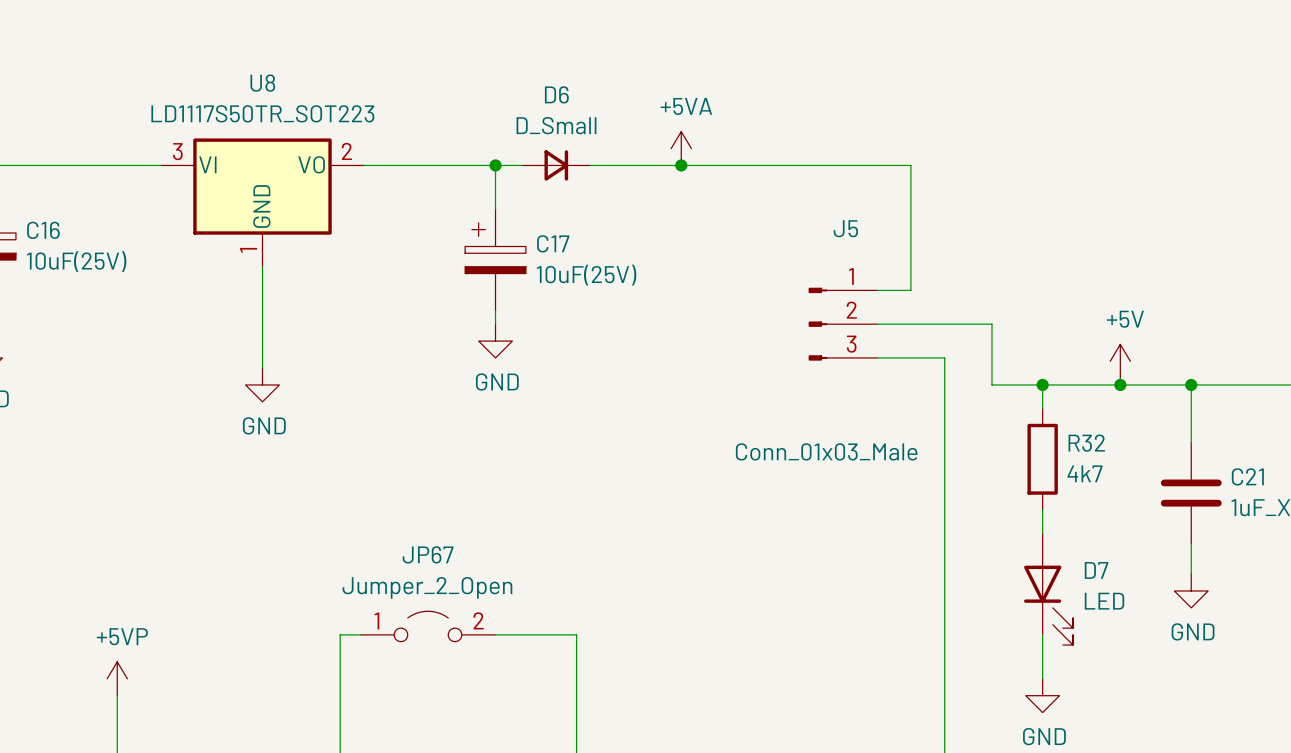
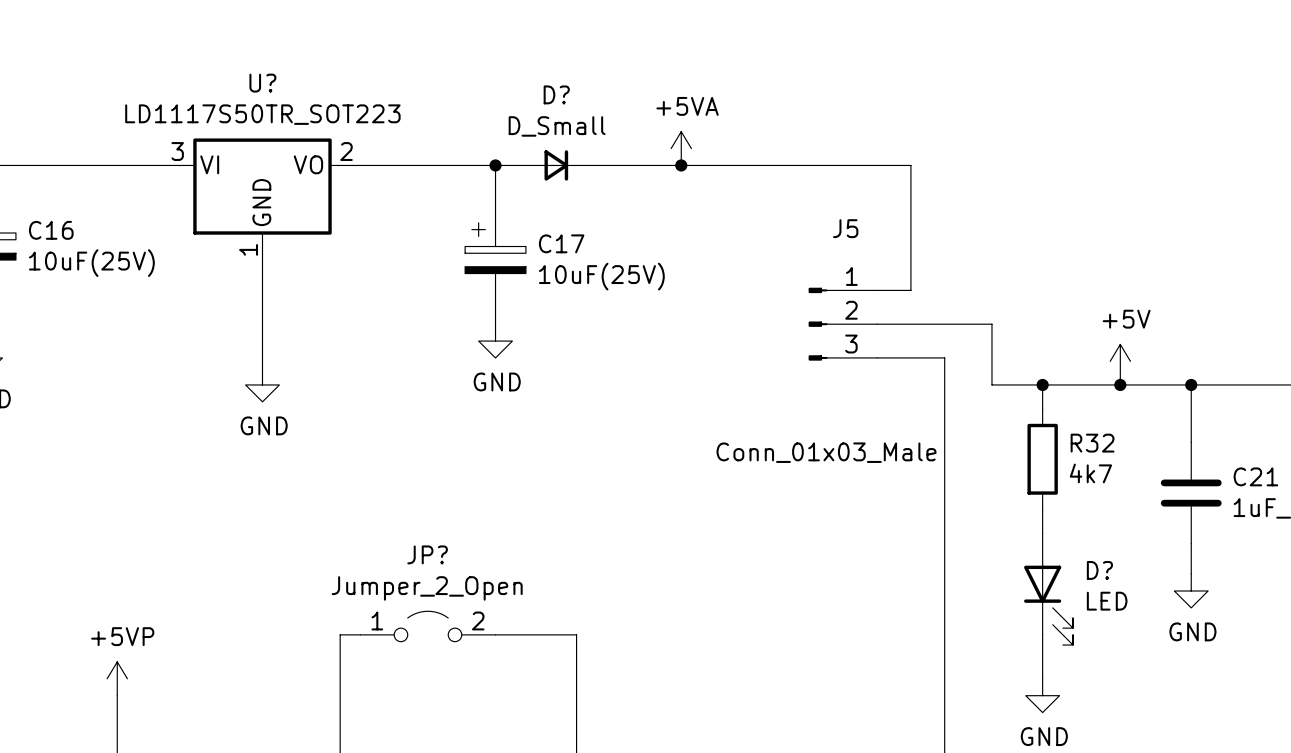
U8 name: U8 (262, 83) -> U? (262, 83)
D6 name: D6 (556, 94) -> D? (556, 94)
JP67 name: JP67 (428, 554) -> JP? (427, 554)
D7 name: D7 (1096, 570) -> D? (1099, 570)

